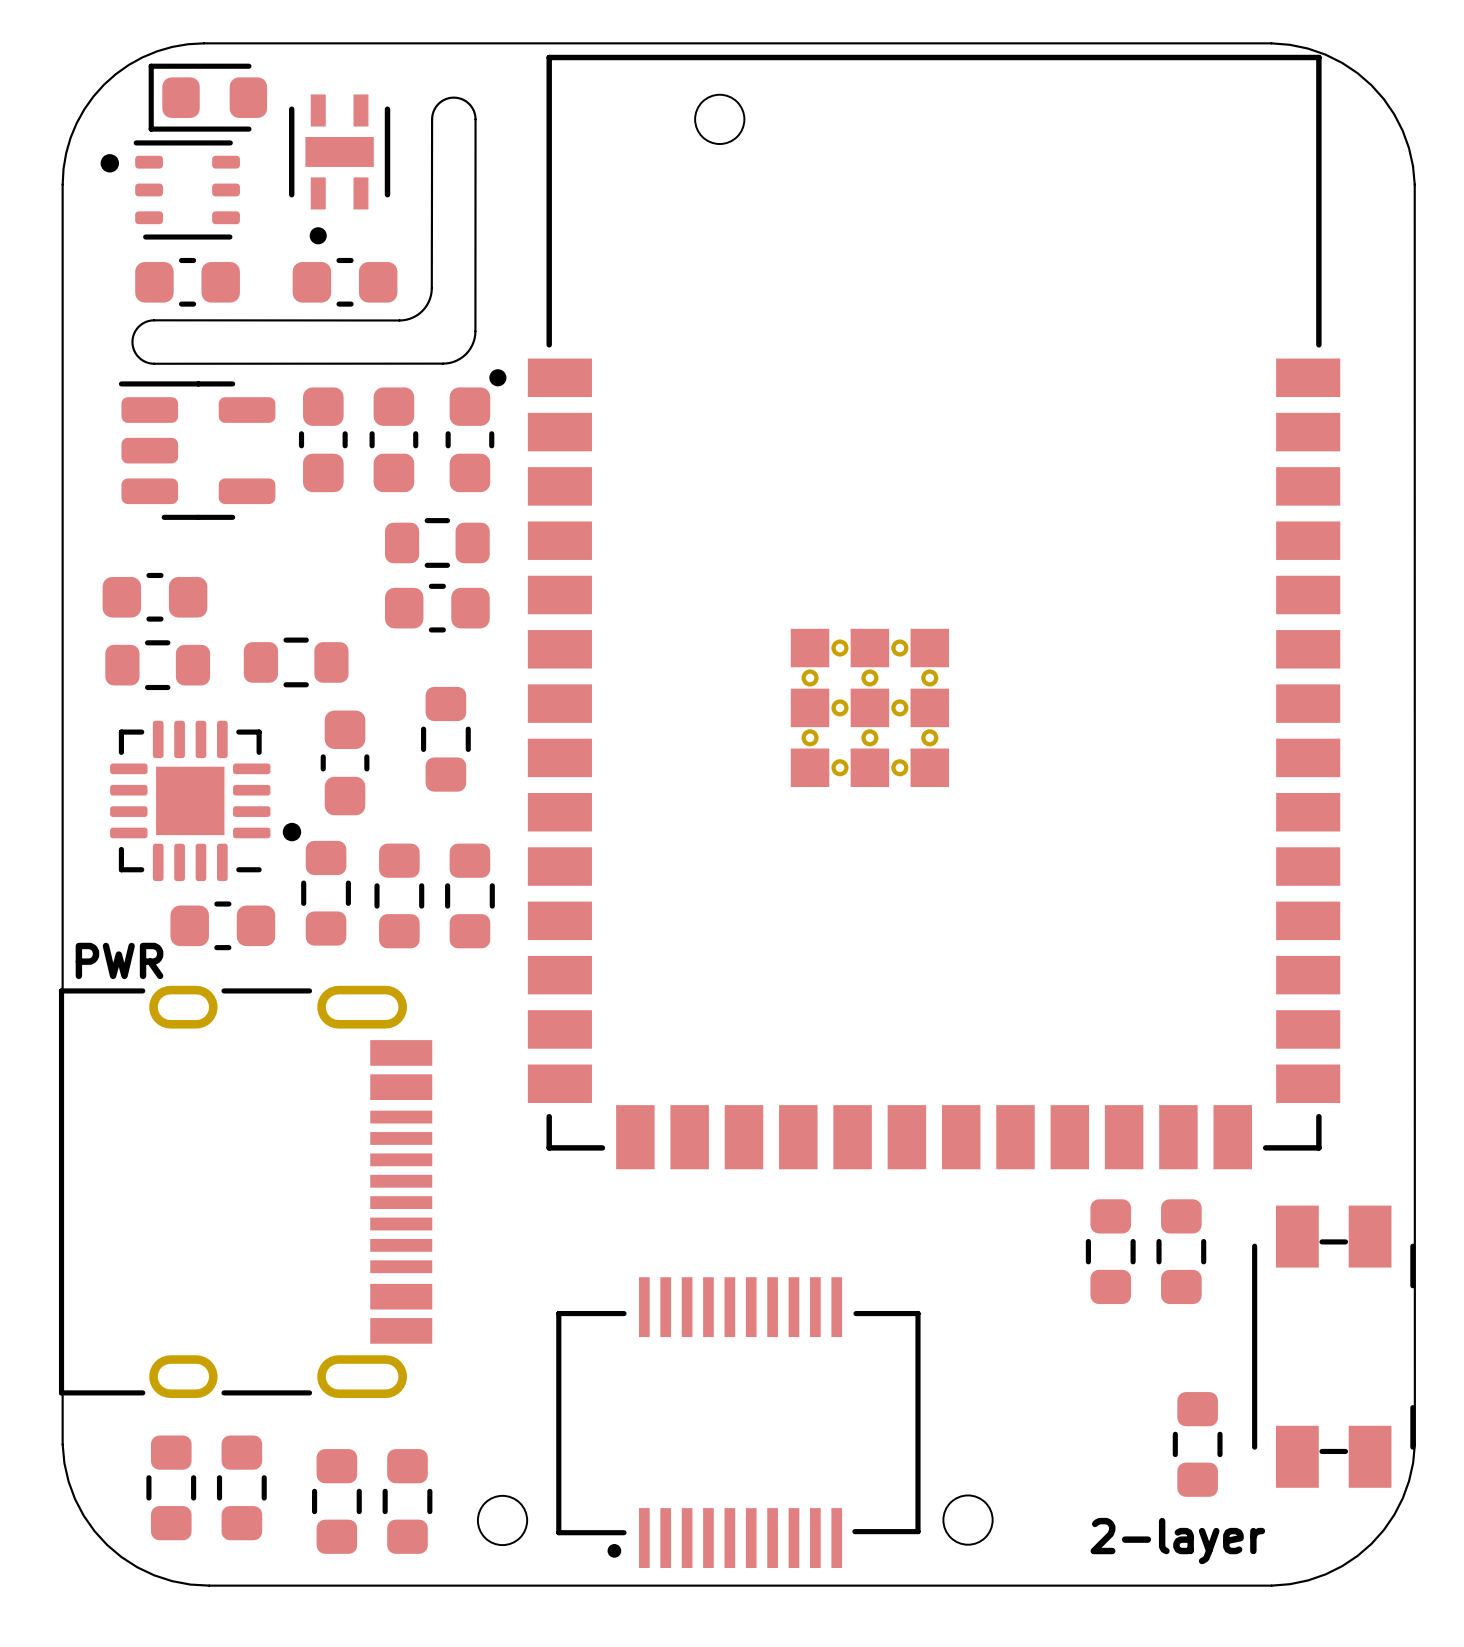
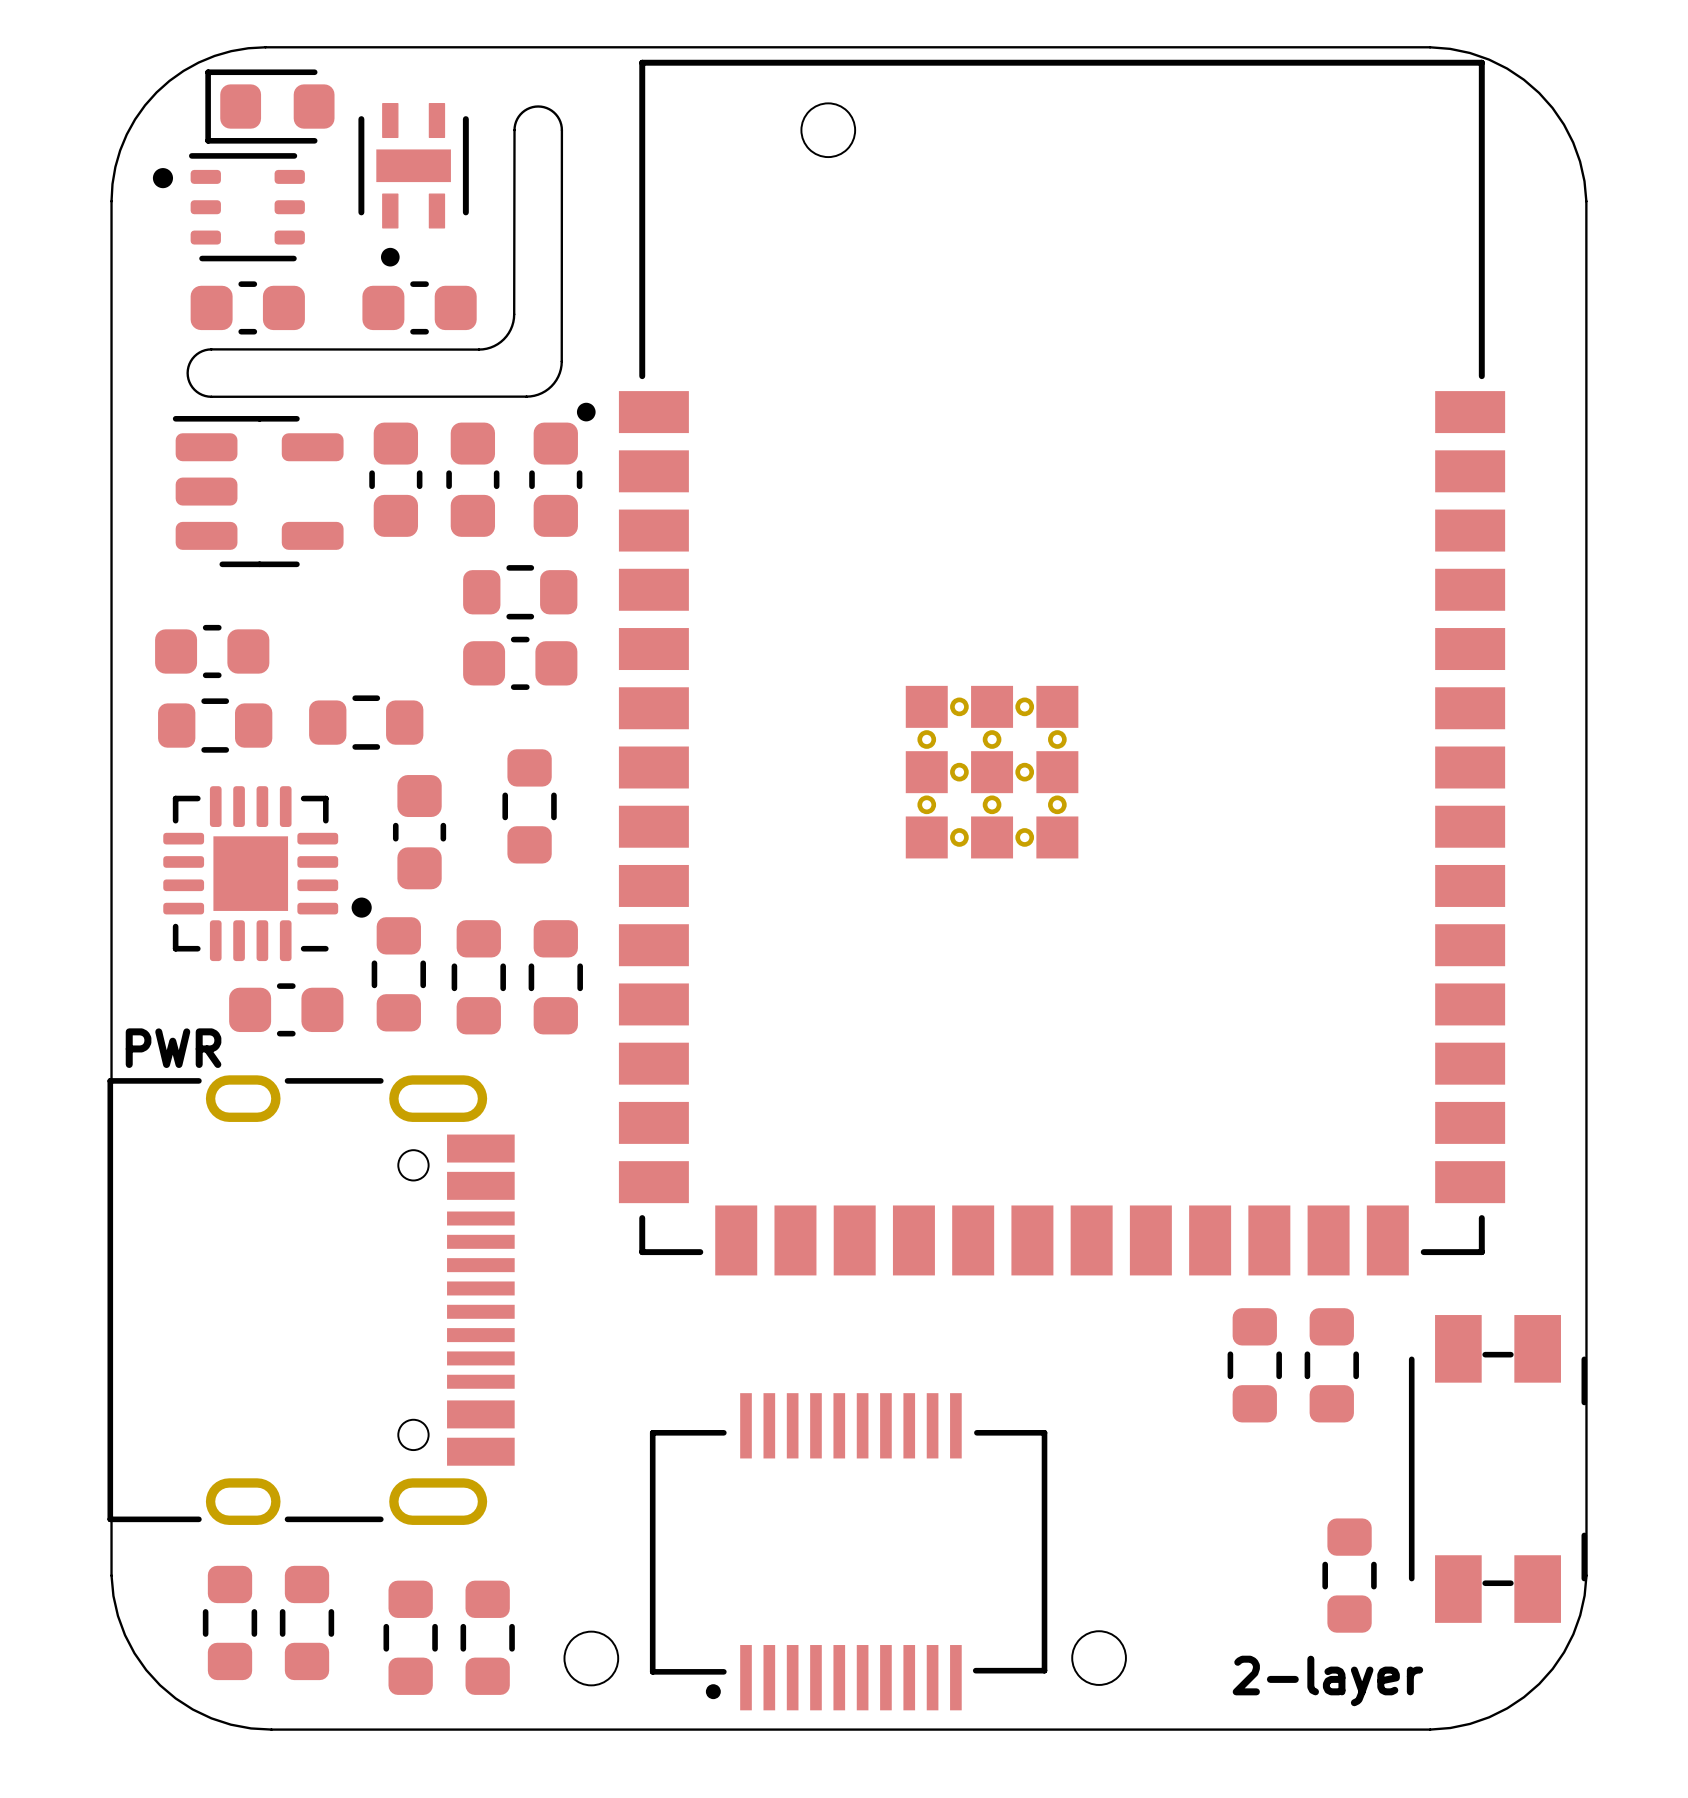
part footprint: [58, 985, 433, 1399] -> [107, 1075, 515, 1525]

